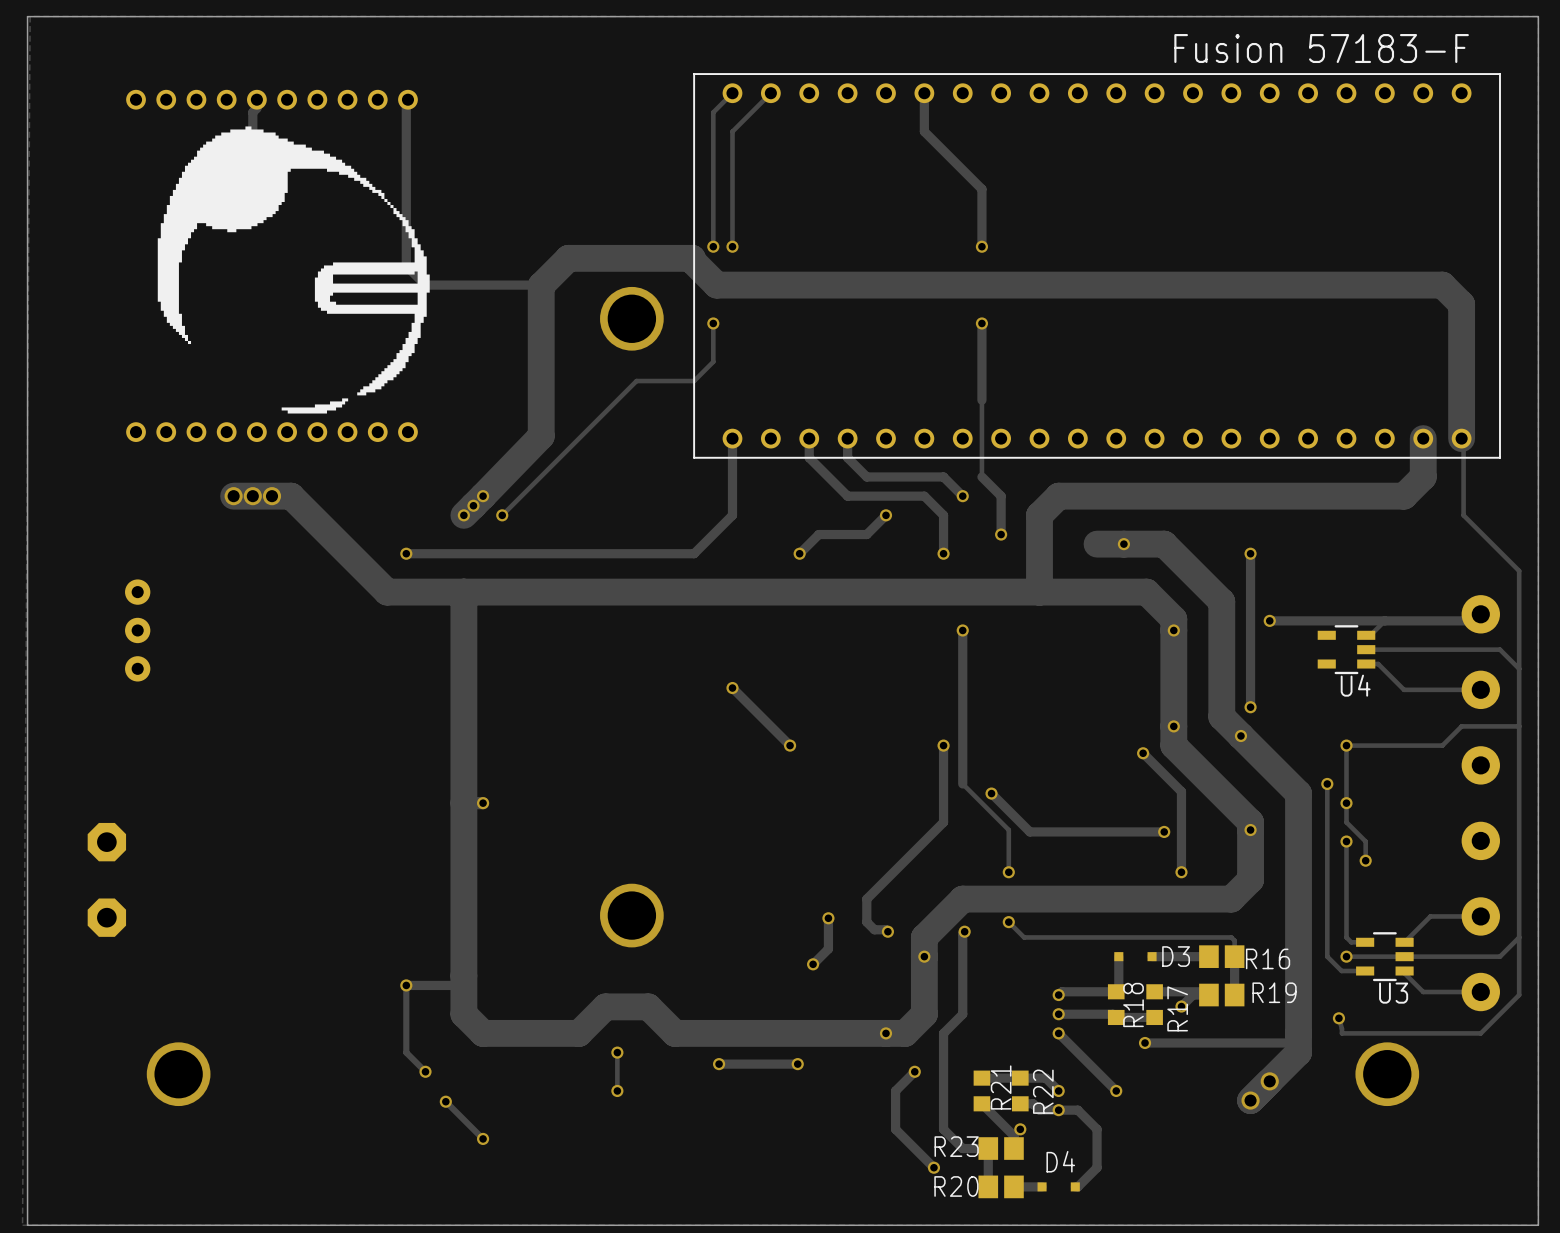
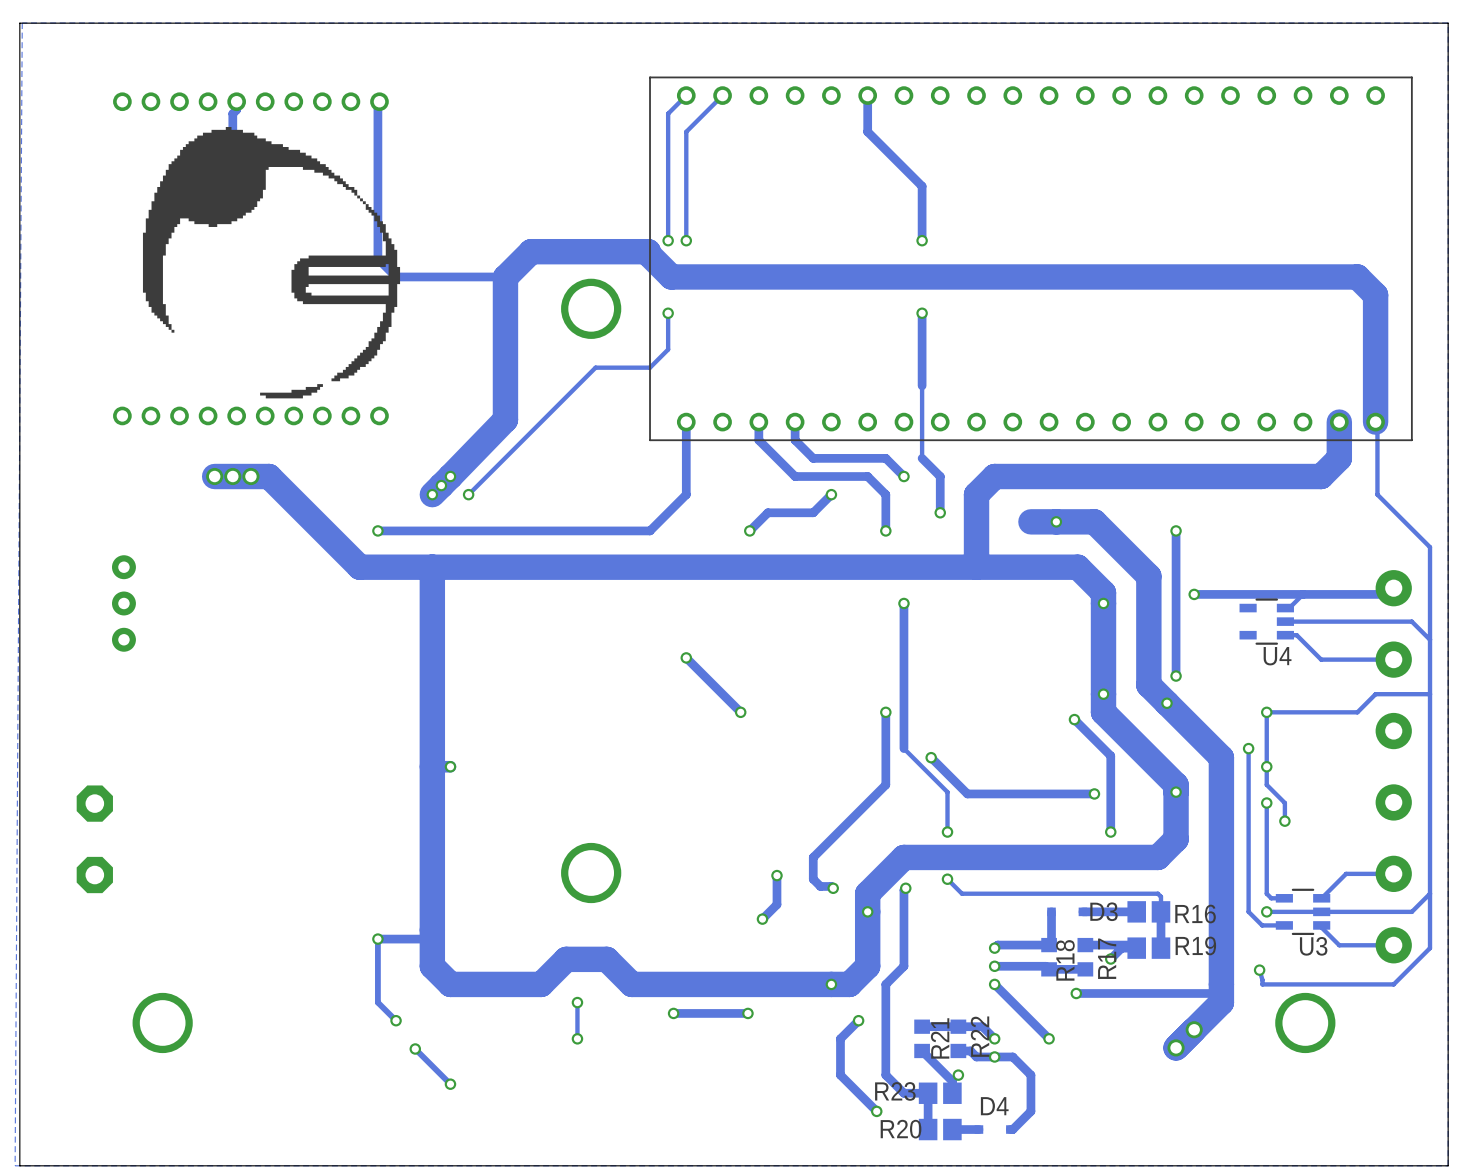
text: Fusion 57183-F (1321, 48) -> none

